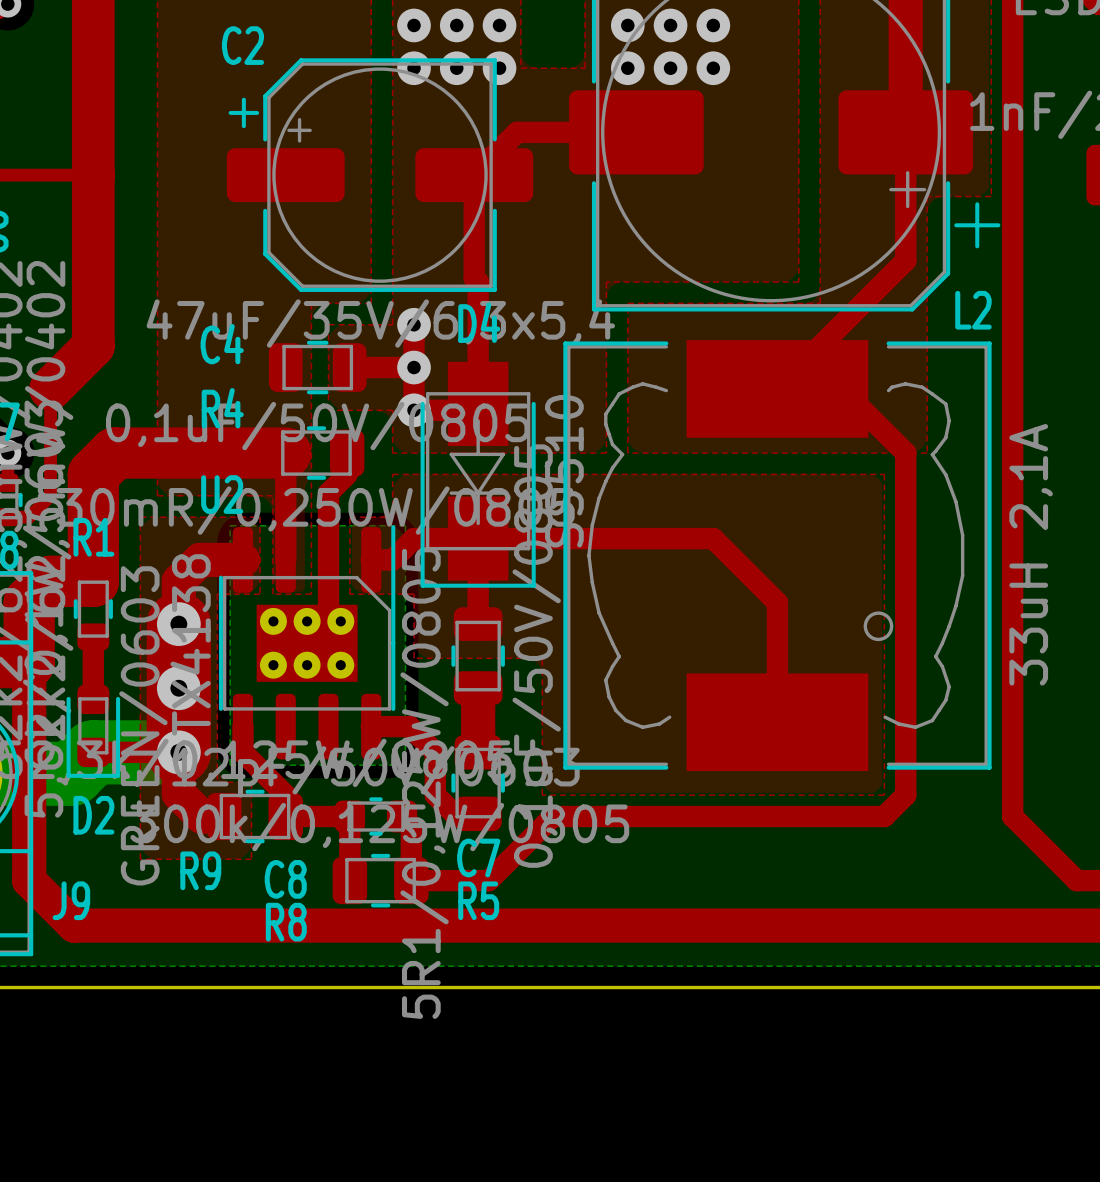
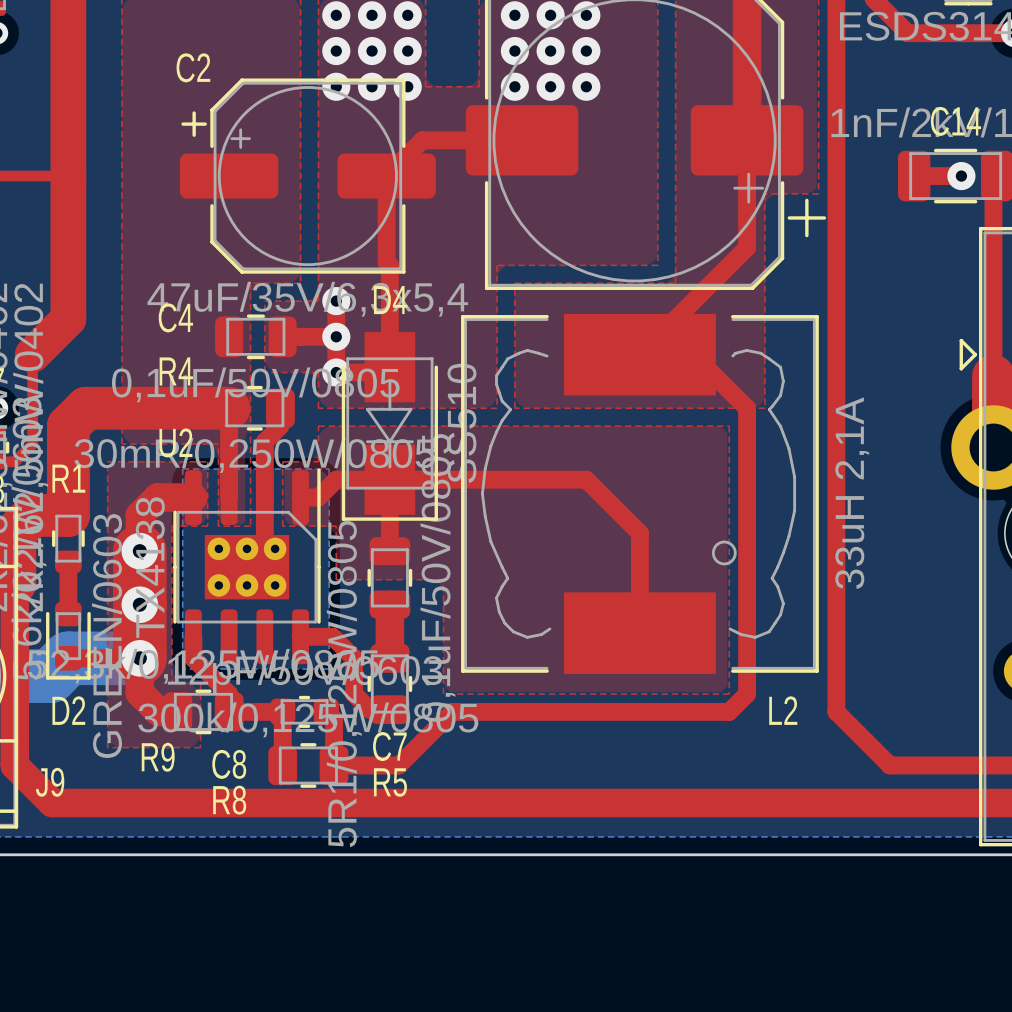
L2 name position: L2 (973, 310) -> L2 (783, 710)

